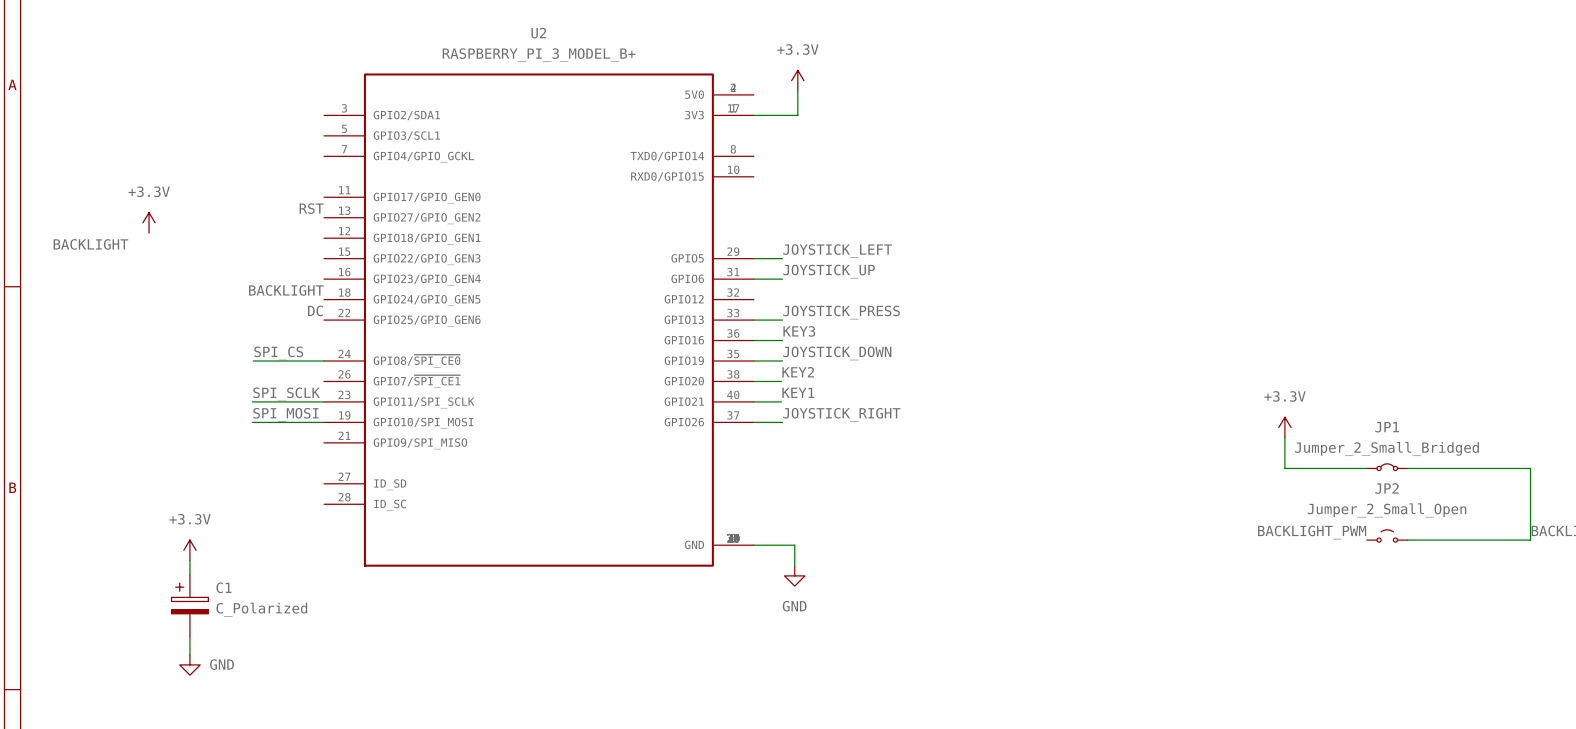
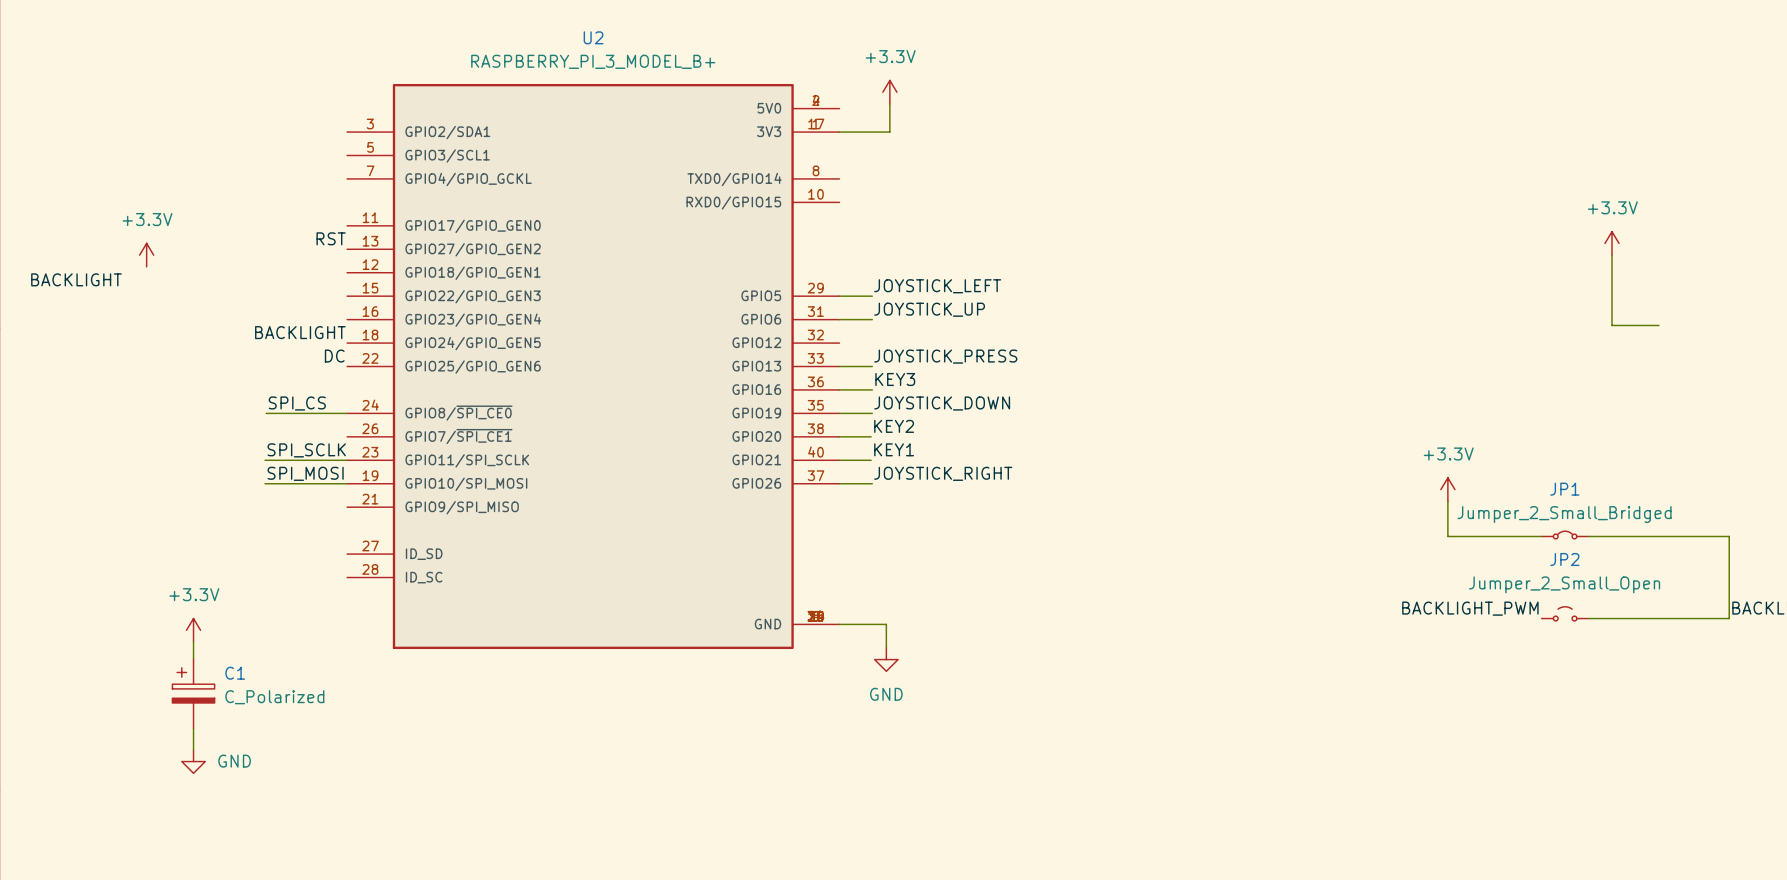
power symbol: none -> +3.3V (1612, 243)
wire: none -> (1612, 255) (1612, 325) (1658, 325)

